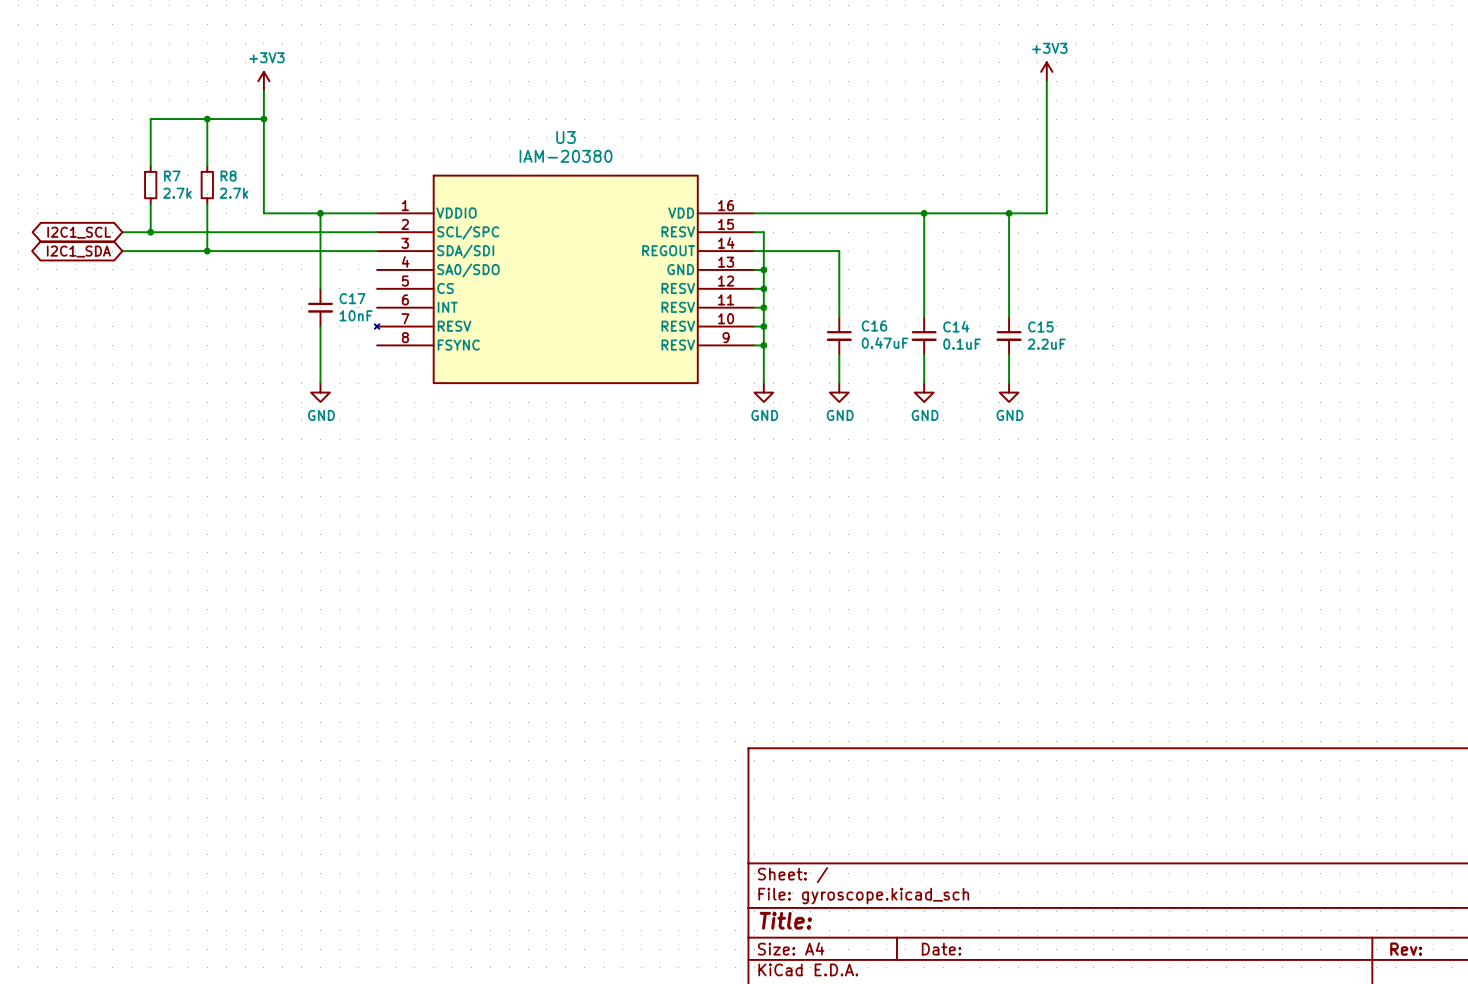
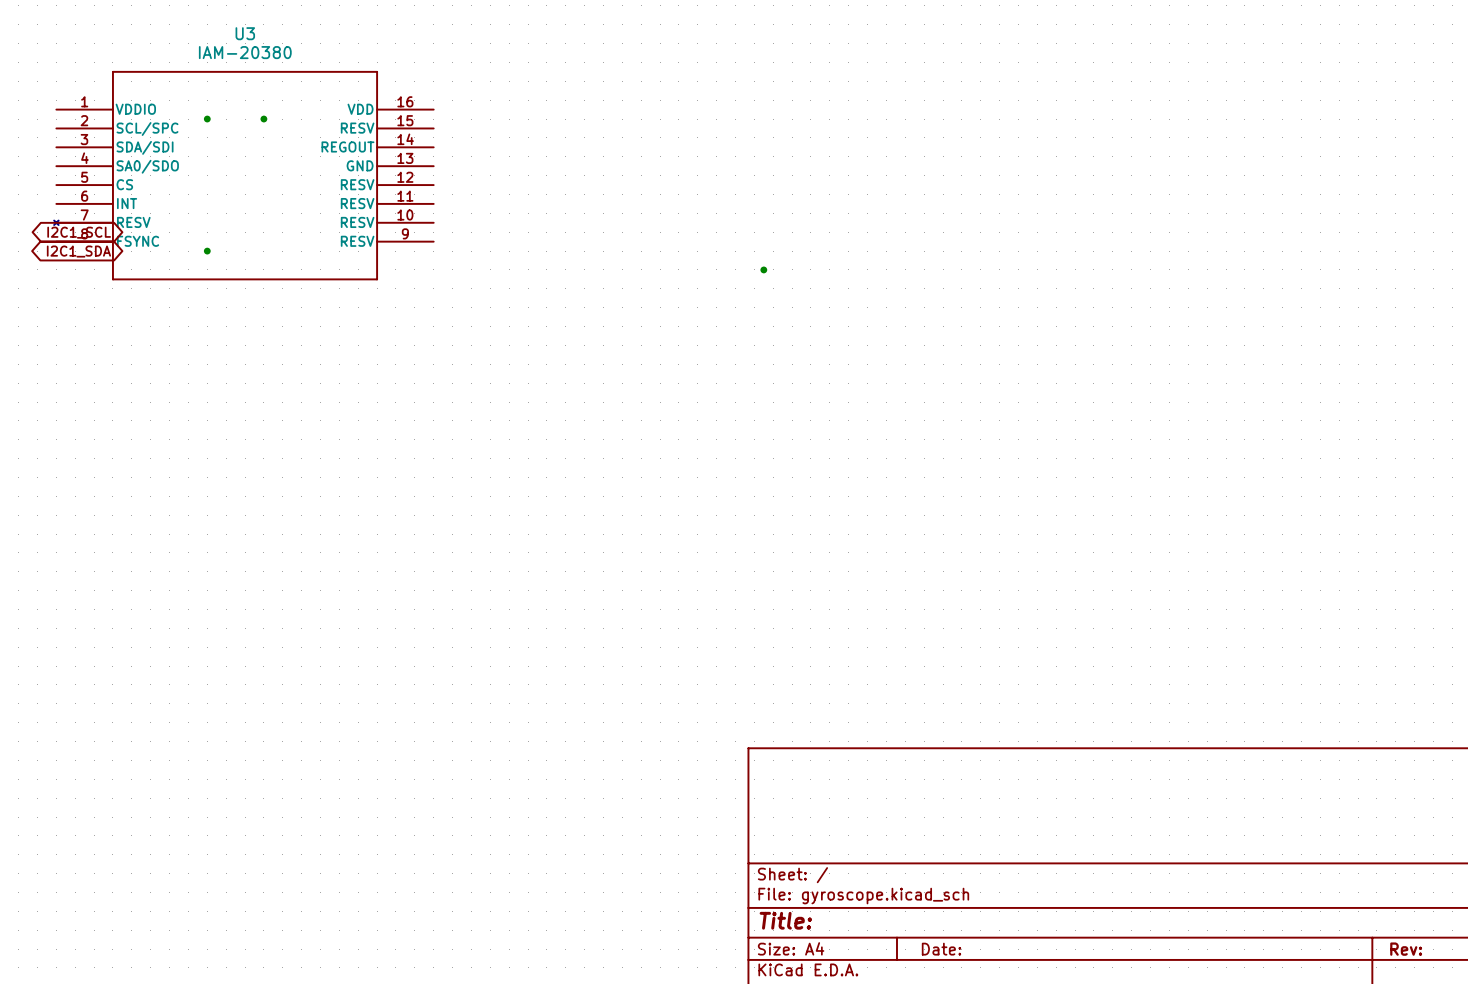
power symbol: +3V3 (1046, 71) -> none
power symbol: +3V3 (263, 81) -> none
wire: (1046, 81) (1046, 213) (754, 213) -> none
wire: (263, 90) (263, 213) (377, 213) -> none
wire: (207, 119) (207, 166) -> none
wire: (263, 119) (150, 119) (150, 166) -> none
U3 symbol: [374, 175, 755, 384] -> [54, 71, 434, 280]
R7: 2.7k (150, 185) -> none
R8: 2.7k (207, 185) -> none
wire: (150, 203) (150, 232) -> none
wire: (207, 203) (207, 251) -> none
wire: (320, 213) (320, 288) -> none
junction: (320, 213) -> none
wire: (924, 213) (924, 317) -> none
junction: (924, 213) -> none
wire: (1009, 213) (1009, 317) -> none
junction: (1009, 213) -> none
wire: (122, 232) (377, 232) -> none
junction: (150, 232) -> none
wire: (754, 232) (763, 232) (763, 383) -> none
wire: (122, 251) (377, 251) -> none
wire: (754, 251) (839, 251) (839, 317) -> none
wire: (754, 269) (763, 269) -> none
wire: (754, 288) (763, 288) -> none
junction: (763, 288) -> none
C17: 10nF (320, 307) -> none
wire: (754, 307) (763, 307) -> none
junction: (763, 307) -> none
wire: (320, 326) (320, 383) -> none
wire: (754, 326) (763, 326) -> none
junction: (763, 326) -> none
C16: 0.47uF (839, 335) -> none
C14: 0.1uF (924, 335) -> none
C15: 2.2uF (1009, 335) -> none
wire: (754, 345) (763, 345) -> none
junction: (763, 345) -> none
wire: (839, 354) (839, 383) -> none
wire: (924, 354) (924, 383) -> none
wire: (1009, 354) (1009, 383) -> none
power symbol: GND (320, 392) -> none
power symbol: GND (763, 392) -> none
power symbol: GND (839, 392) -> none
power symbol: GND (924, 392) -> none
power symbol: GND (1009, 392) -> none

